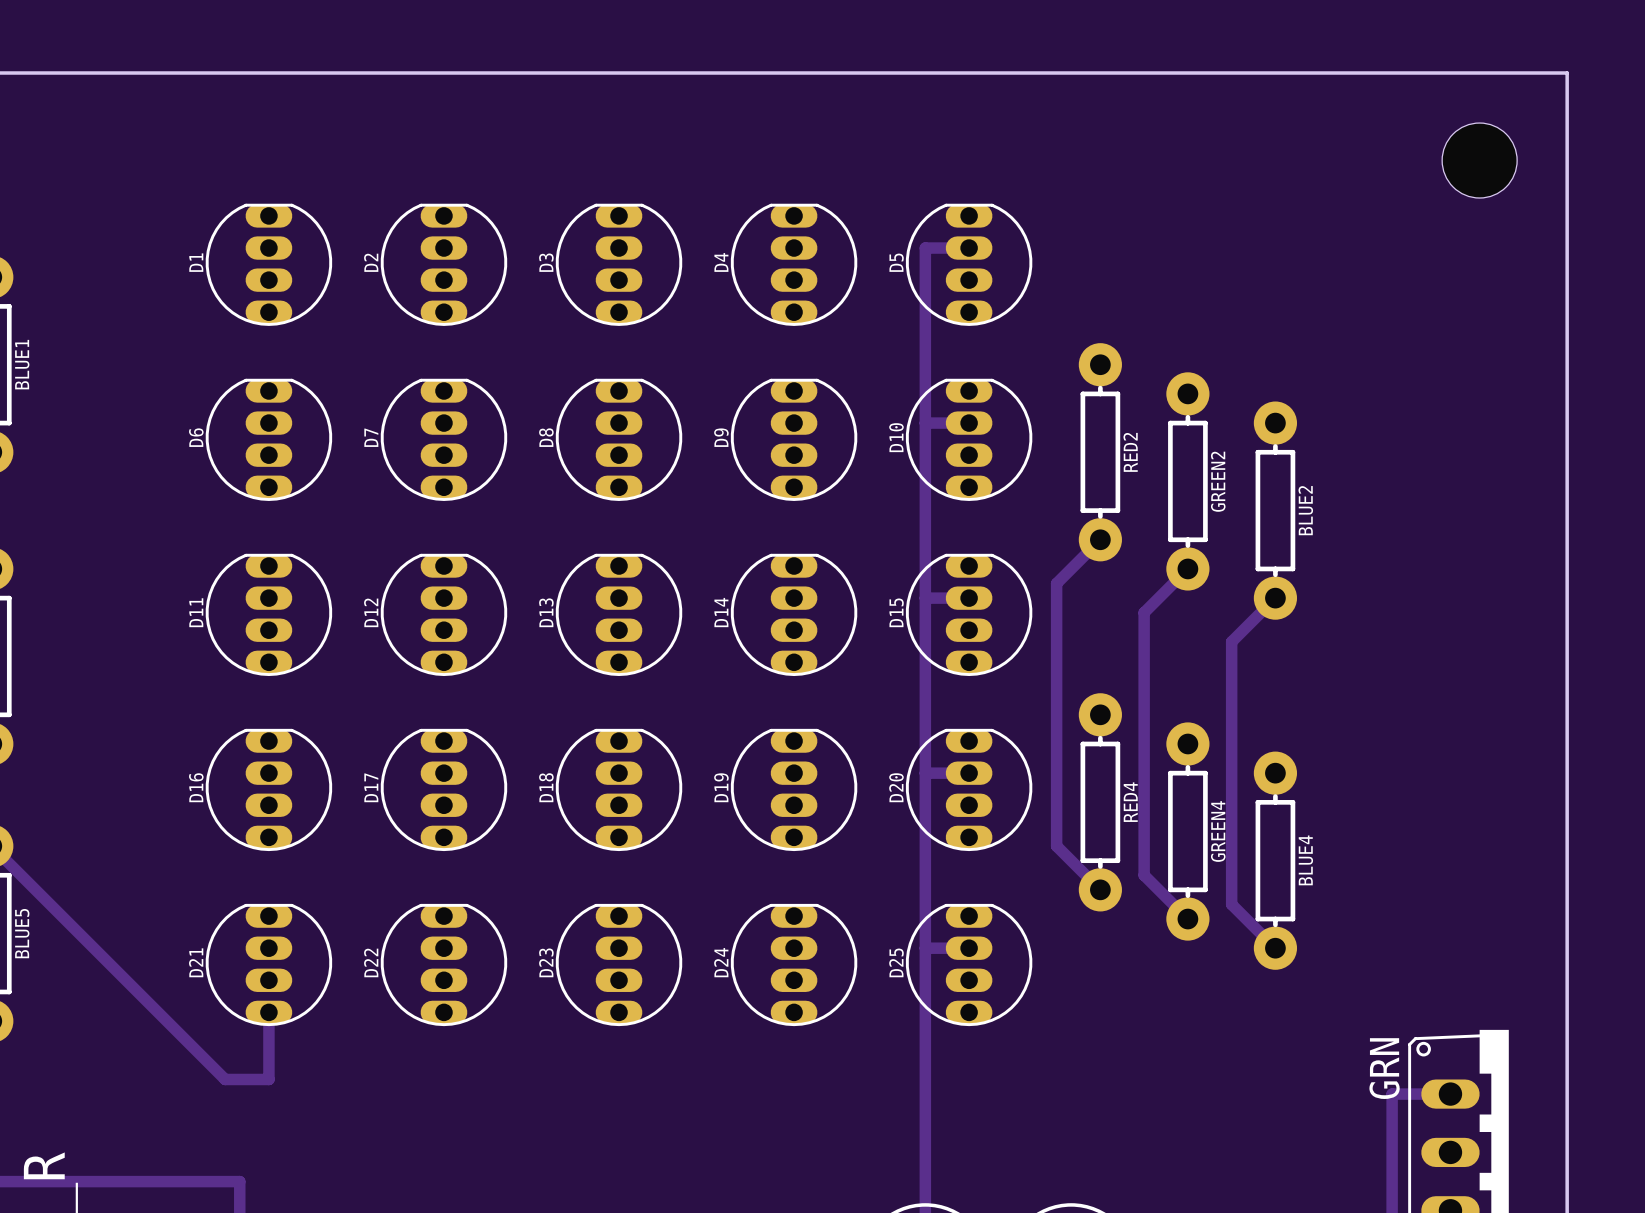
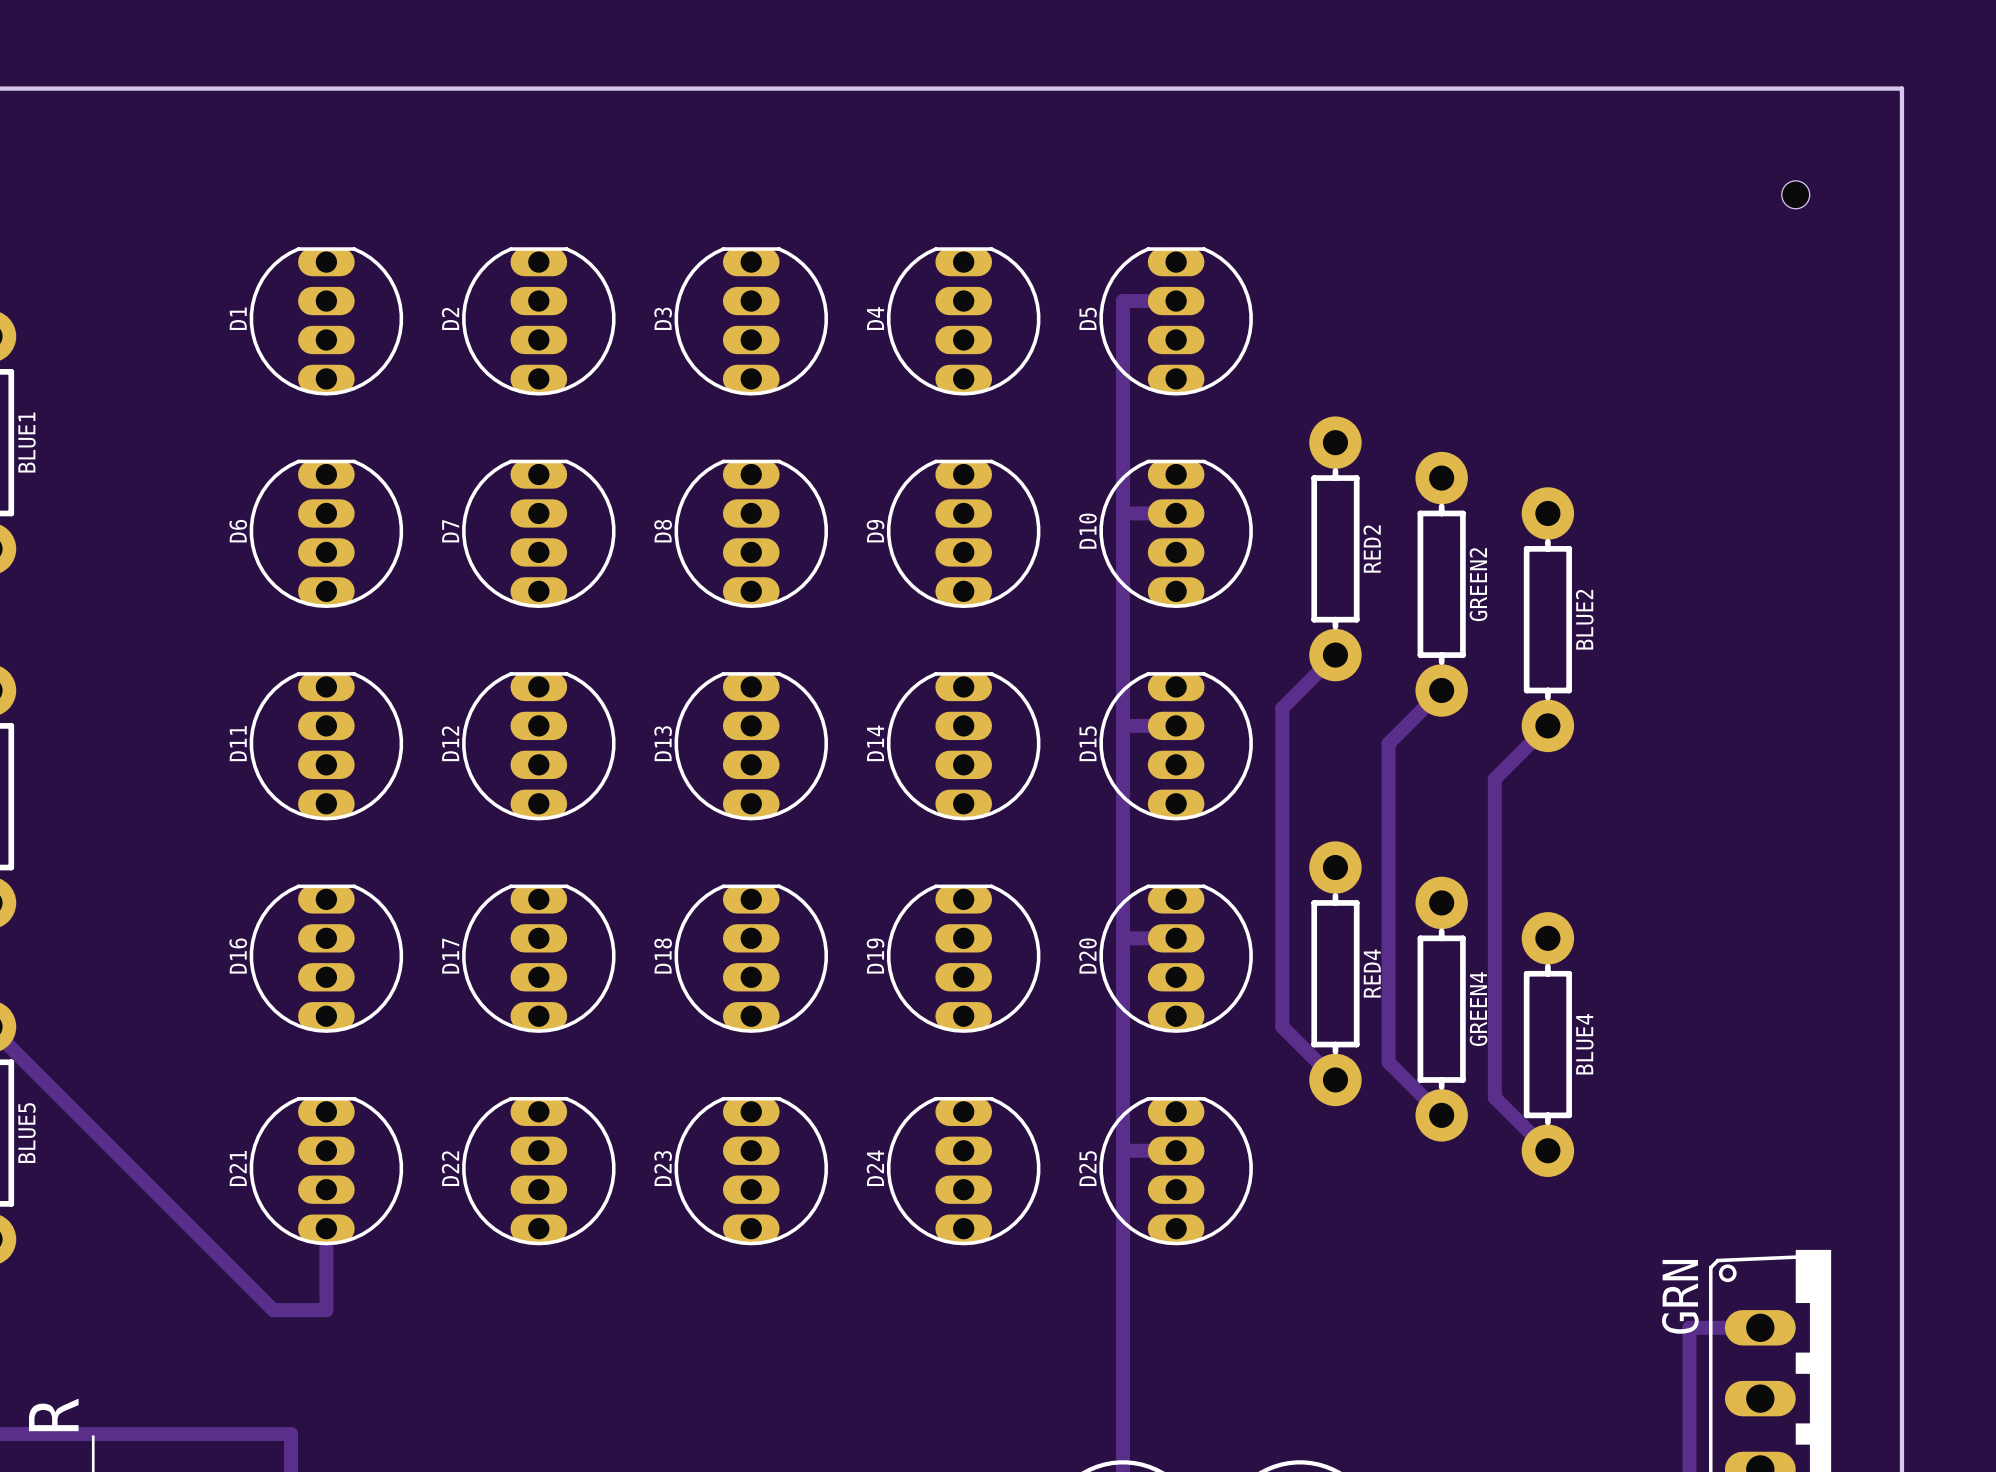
hole size: [1442, 123, 1518, 199] -> [1781, 180, 1810, 209]

